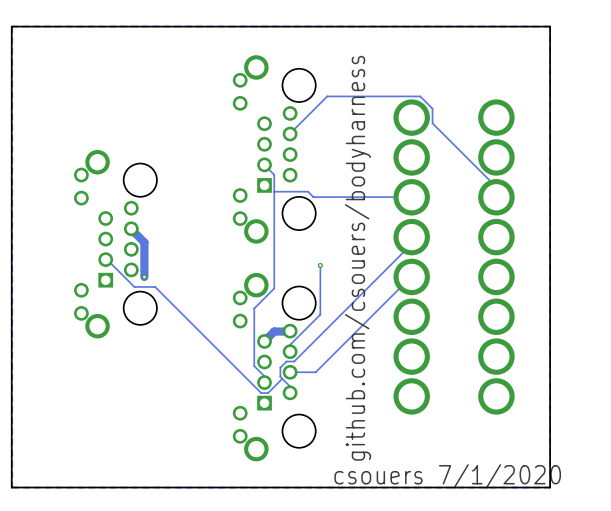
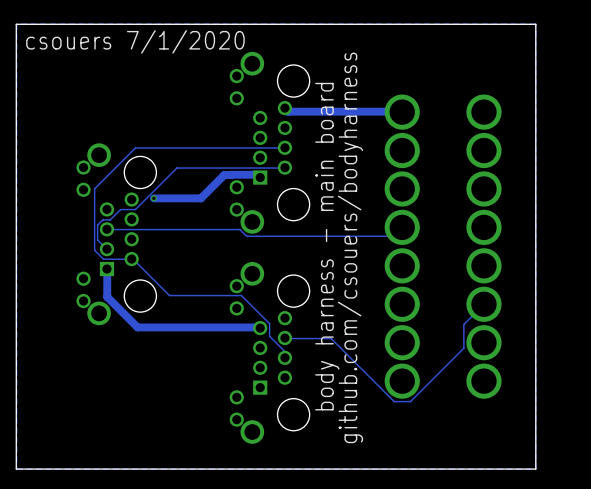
text: none -> csouers 7/1/2020 (135, 41)
track: none -> (284, 108) (288, 111) (402, 112)
track: (290, 134) (327, 96) (420, 96) (432, 108) (432, 123) (496, 187) (496, 197) -> none
track: none -> (284, 147) (135, 148) (94, 188) (94, 250) (103, 259) (131, 259)
track: (264, 164) (274, 174) (274, 288) (254, 308) (254, 366) (264, 376) (264, 382) -> none
track: none -> (260, 177) (257, 174) (224, 174) (200, 198) (153, 198)
track: (274, 191) (308, 191) (313, 197) (411, 197) -> none
via: none -> (153, 198)
track: (131, 228) (144, 242) (144, 276) -> none
track: (411, 237) (411, 244) (294, 361) (286, 361) (280, 367) (280, 376) (289, 386) (290, 392) -> (401, 228) (393, 236) (246, 236) (239, 229) (106, 229)
text: none -> body harness - main board (327, 246)
track: (105, 259) (134, 286) (155, 286) (261, 393) (268, 393) (282, 378) -> (106, 249) (97, 239) (97, 225) (102, 219) (110, 219) (120, 209) (135, 209) (176, 168) (284, 167)
track: (320, 265) (320, 314) (290, 344) (290, 351) -> (483, 304) (463, 324) (463, 348) (410, 401) (394, 401) (331, 338) (284, 338)
via: (320, 265) -> none
via: (144, 276) -> none
track: (411, 276) (315, 372) (290, 372) -> (131, 259) (169, 295) (241, 295) (269, 323) (269, 336) (284, 351) (284, 357)
track: (290, 331) (274, 331) (264, 341) -> (106, 269) (107, 297) (137, 327) (260, 328)
text: csouers 7/1/2020 (447, 476) -> none

